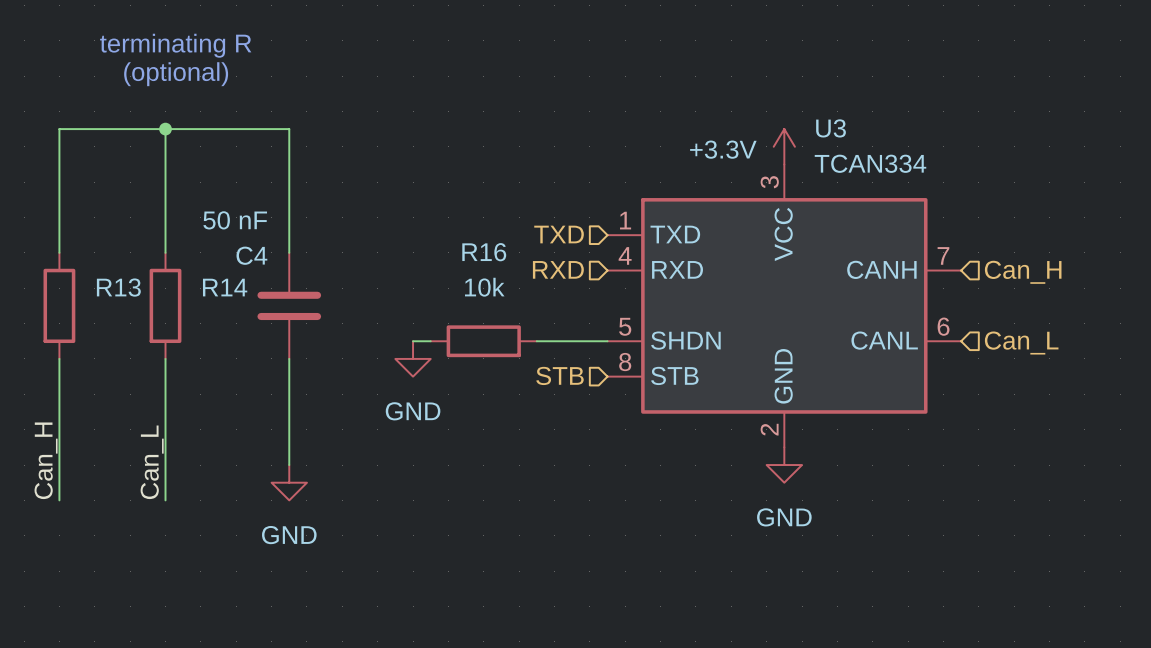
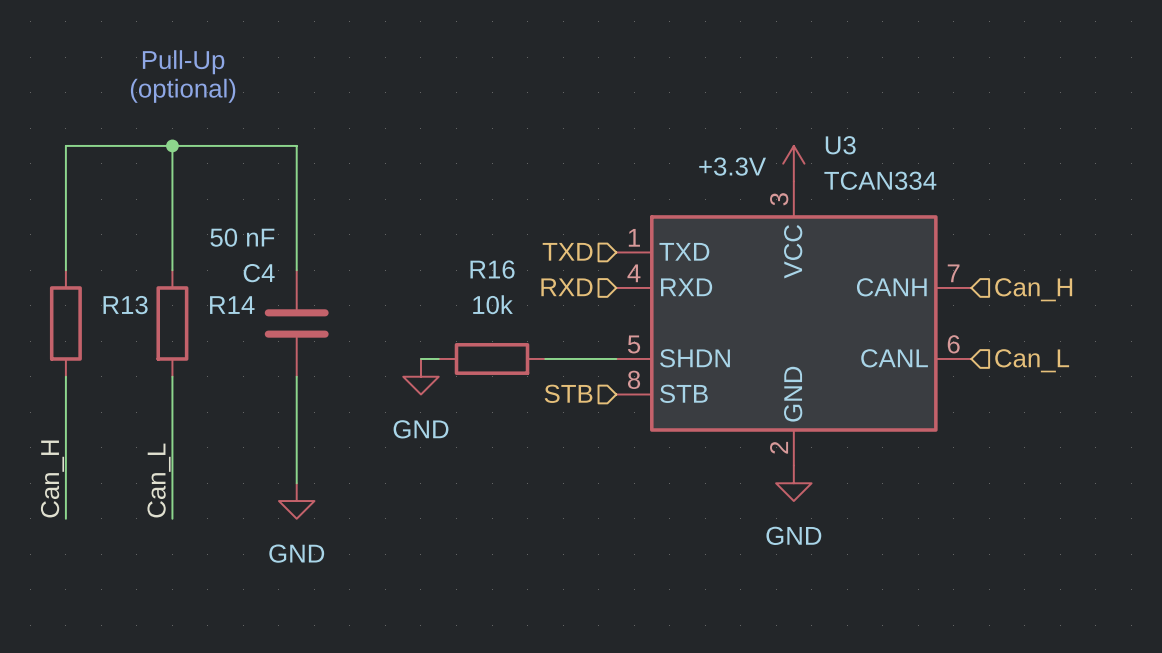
text: terminating R (175, 45) -> Pull-Up (183, 62)

